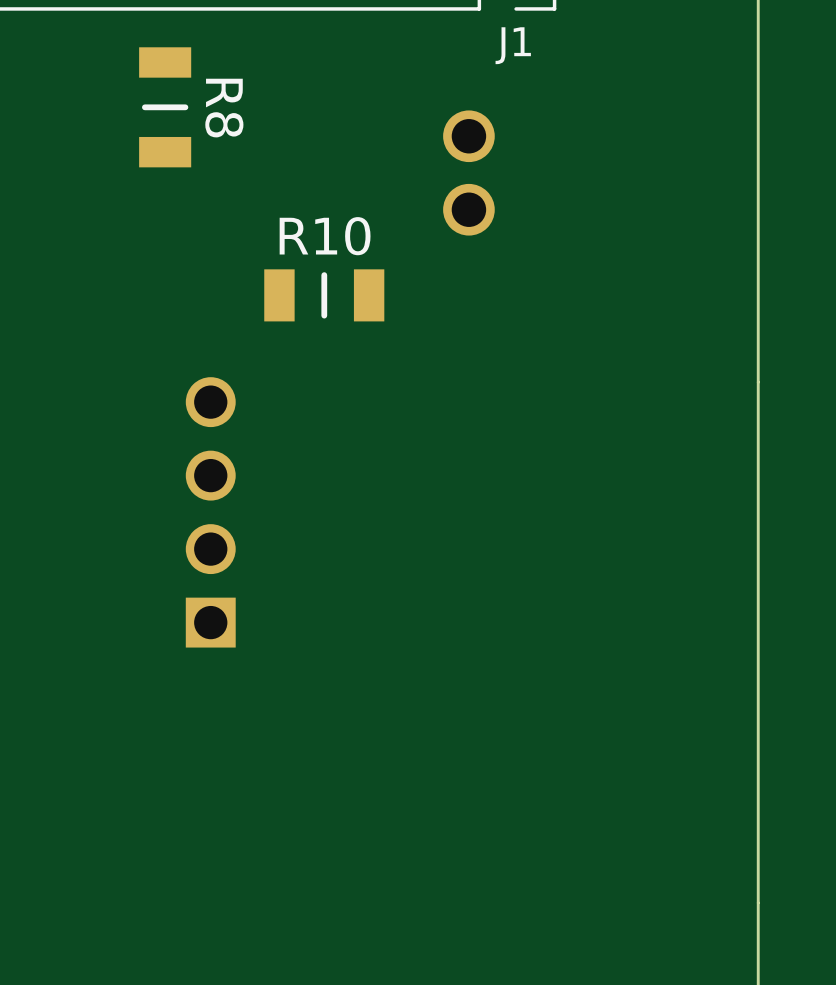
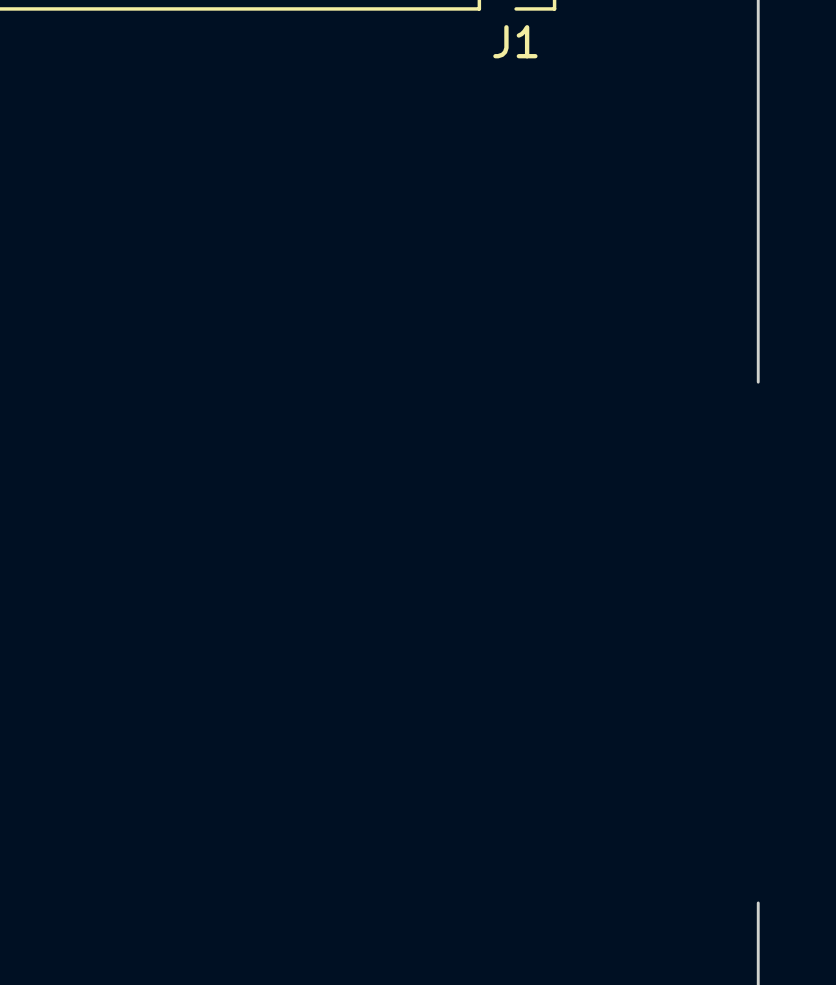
R8: (165, 107) -> none
part: (468, 172) -> none
R10: (324, 295) -> none
board edge: (758, 382) (758, 902) -> none
part: (210, 512) -> none

